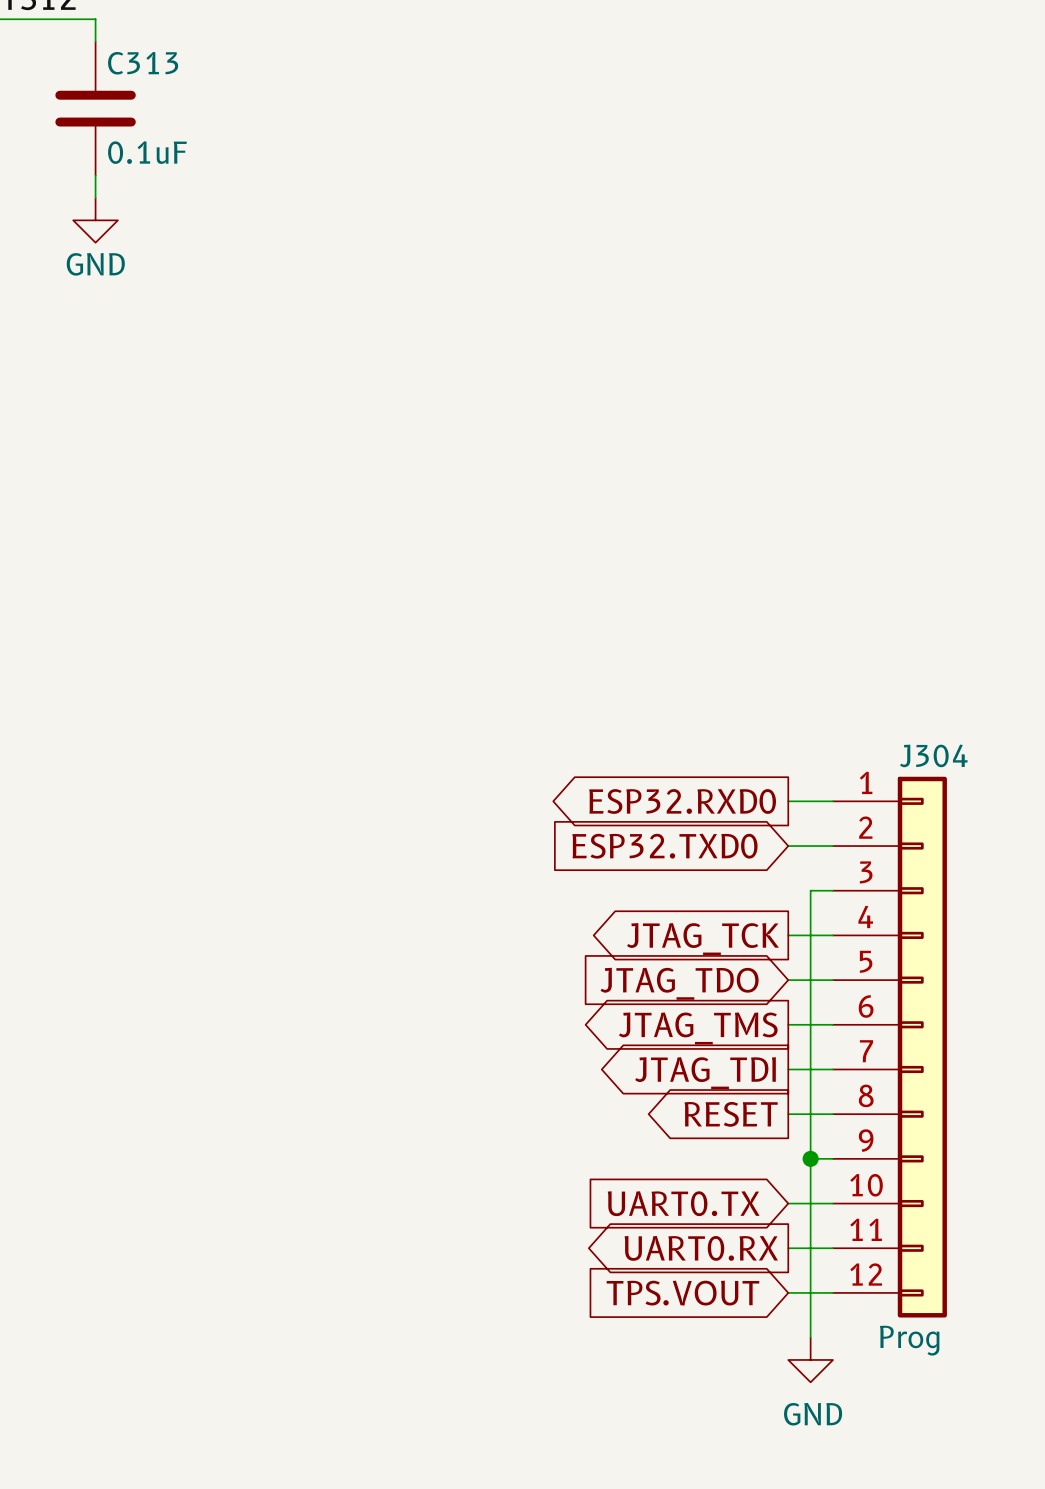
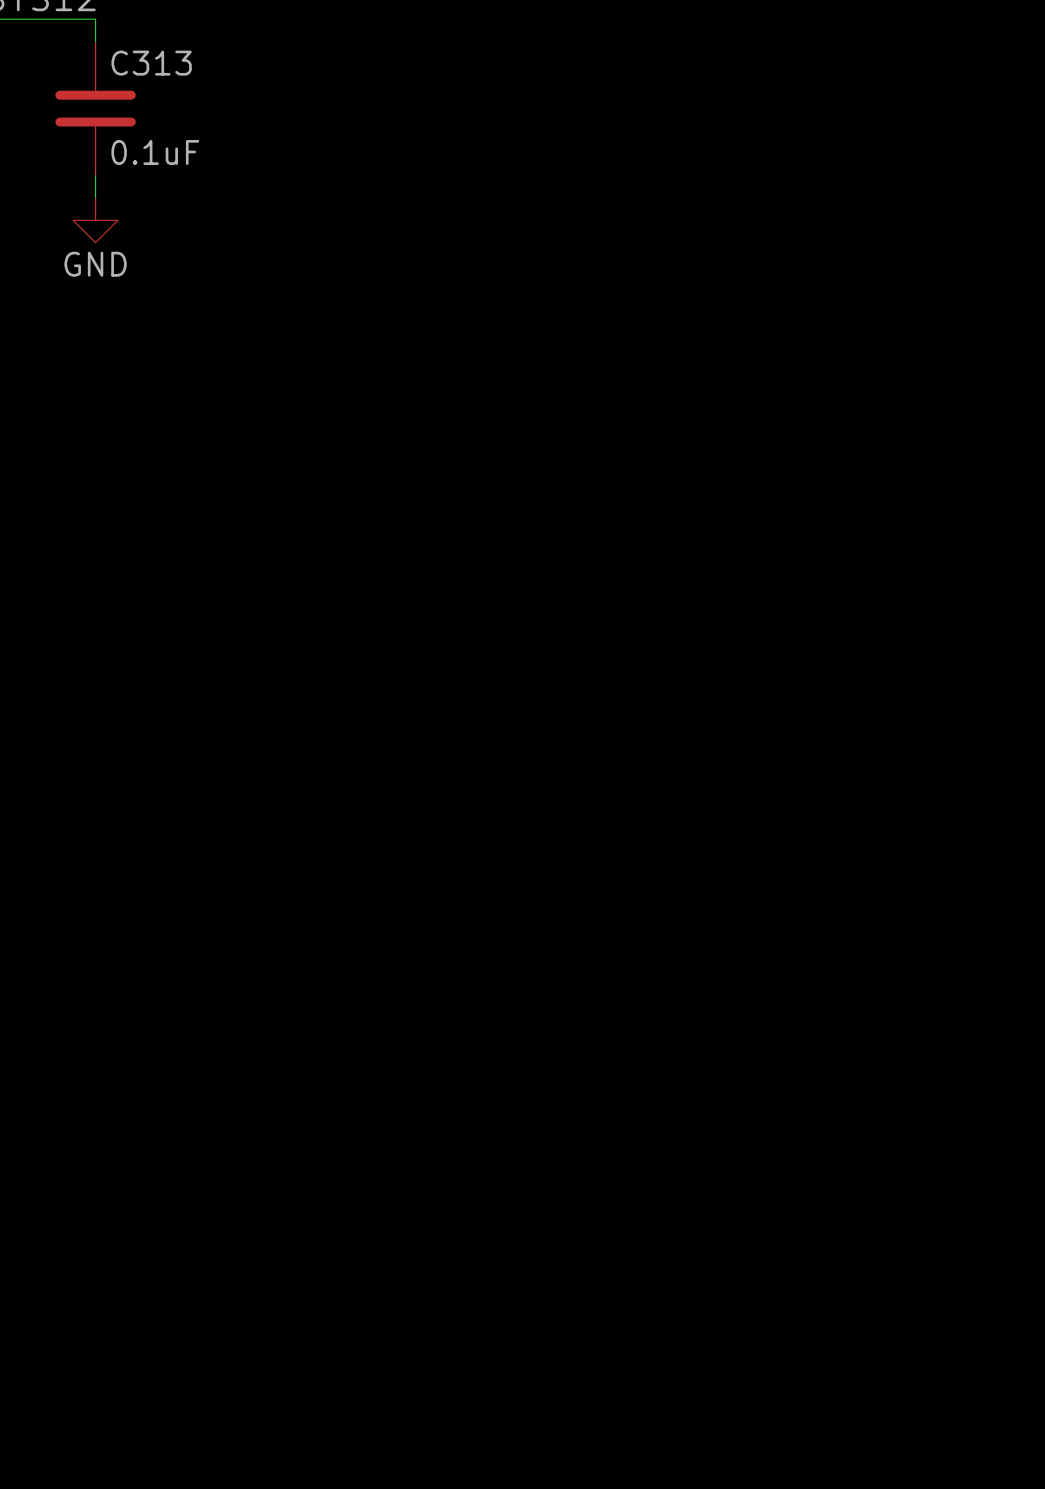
global label: ESP32.RXD0 (682, 801) -> none
wire: (788, 801) (832, 801) -> none
global label: ESP32.TXD0 (664, 846) -> none
wire: (788, 846) (832, 846) -> none
wire: (832, 890) (810, 890) (810, 1337) -> none
wire: (788, 935) (832, 935) -> none
global label: JTAG_TCK (702, 939) -> none
wire: (788, 980) (832, 980) -> none
global label: JTAG_TDO (679, 983) -> none
wire: (788, 1024) (832, 1024) -> none
global label: JTAG_TMS (698, 1028) -> none
J304: Prog (889, 1047) -> none
wire: (788, 1069) (832, 1069) -> none
global label: JTAG_TDI (705, 1073) -> none
global label: RESET (731, 1114) -> none
wire: (788, 1114) (832, 1114) -> none
wire: (810, 1158) (832, 1158) -> none
junction: (810, 1158) -> none
global label: UART0.TX (683, 1203) -> none
wire: (788, 1203) (832, 1203) -> none
global label: UART0.RX (701, 1248) -> none
wire: (788, 1248) (832, 1248) -> none
wire: (788, 1292) (832, 1292) -> none
global label: TPS.VOUT (682, 1293) -> none
power symbol: GND (810, 1359) -> none

